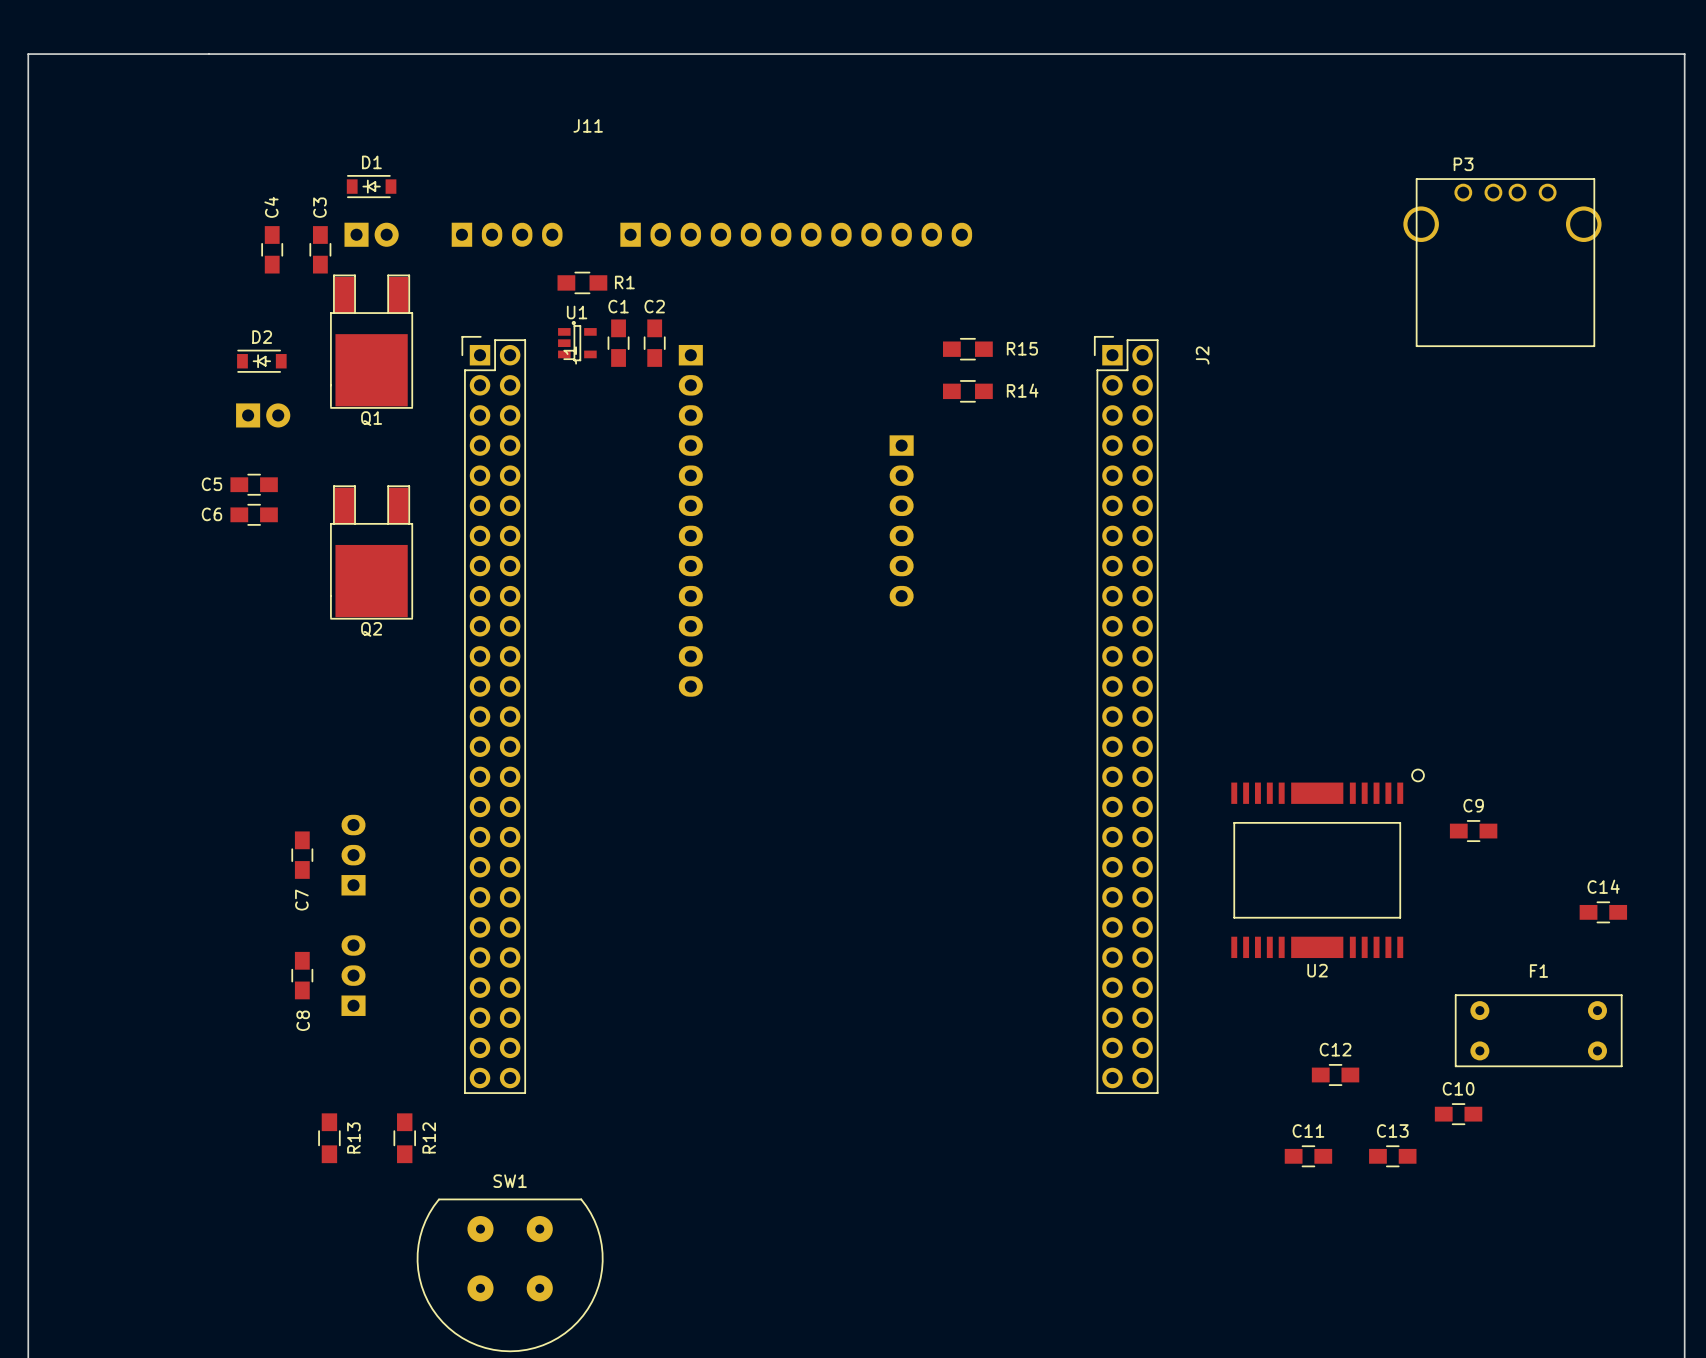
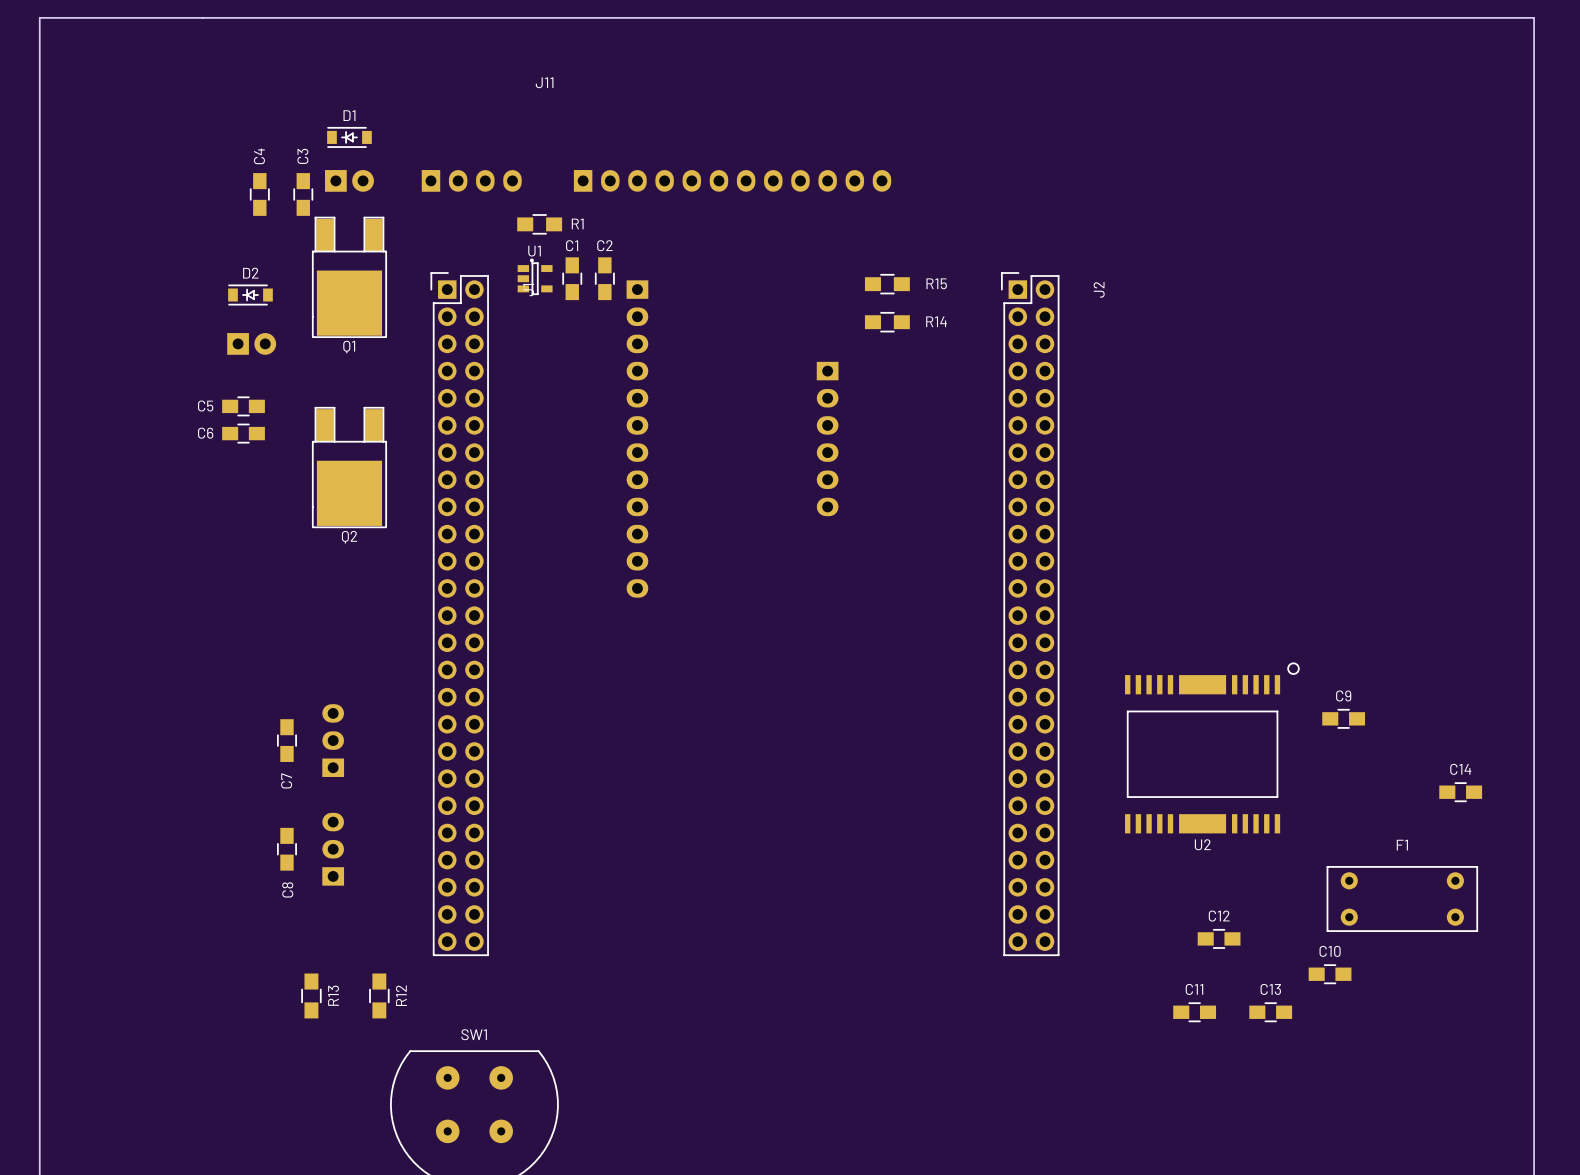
P3: (1502, 262) -> none

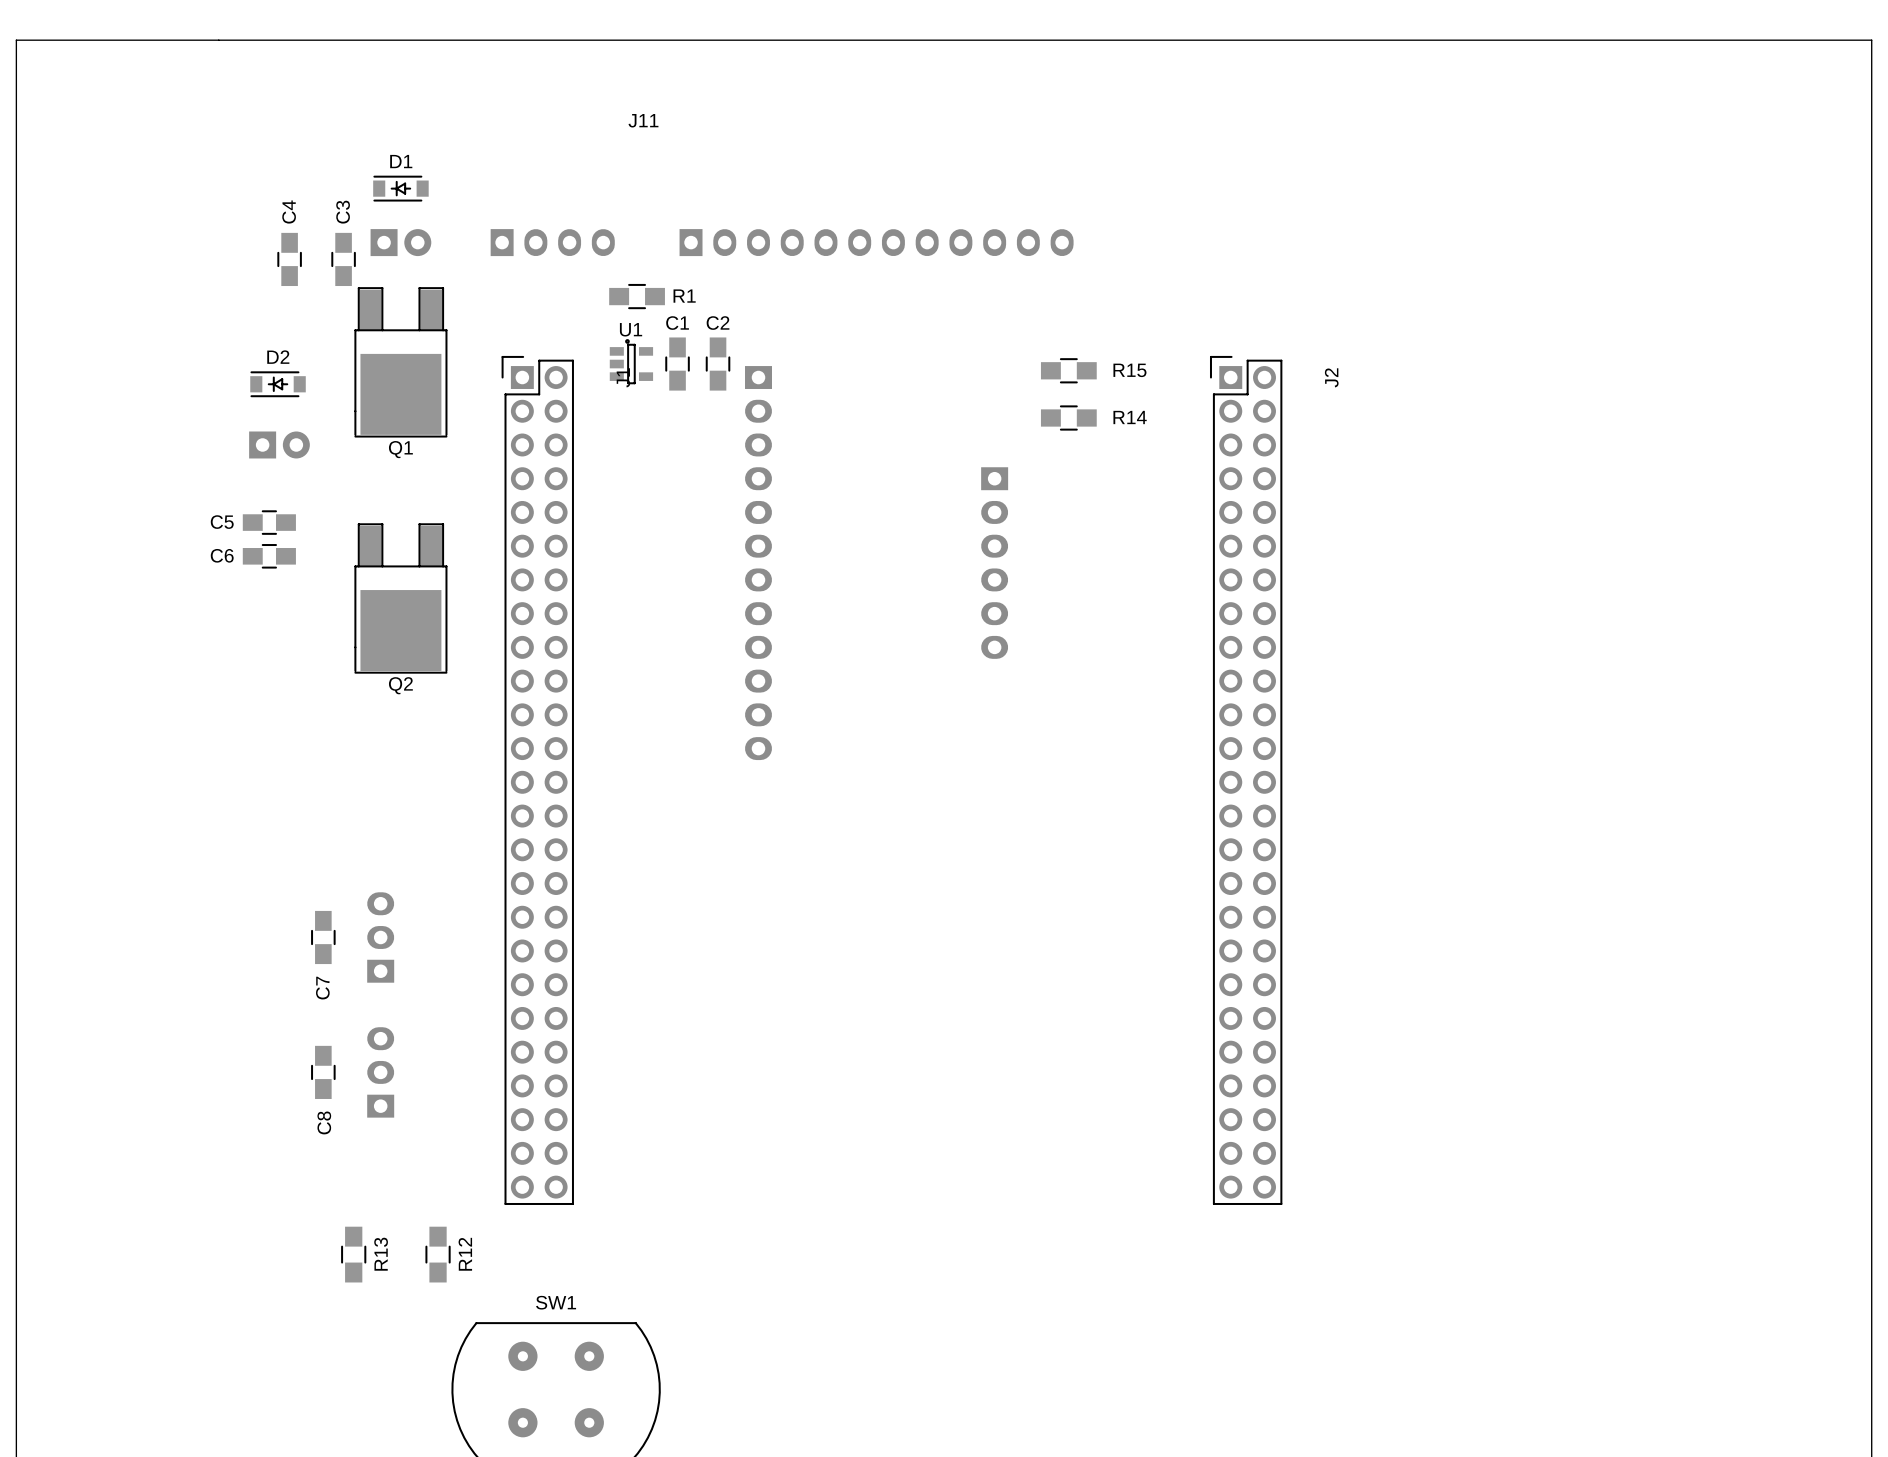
C9: (1343, 718) -> none
U2: (1212, 747) -> none
C14: (1460, 792) -> none
F1: (1402, 898) -> none
C12: (1219, 938) -> none
C10: (1330, 974) -> none
C11: (1194, 1012) -> none
C13: (1270, 1012) -> none

